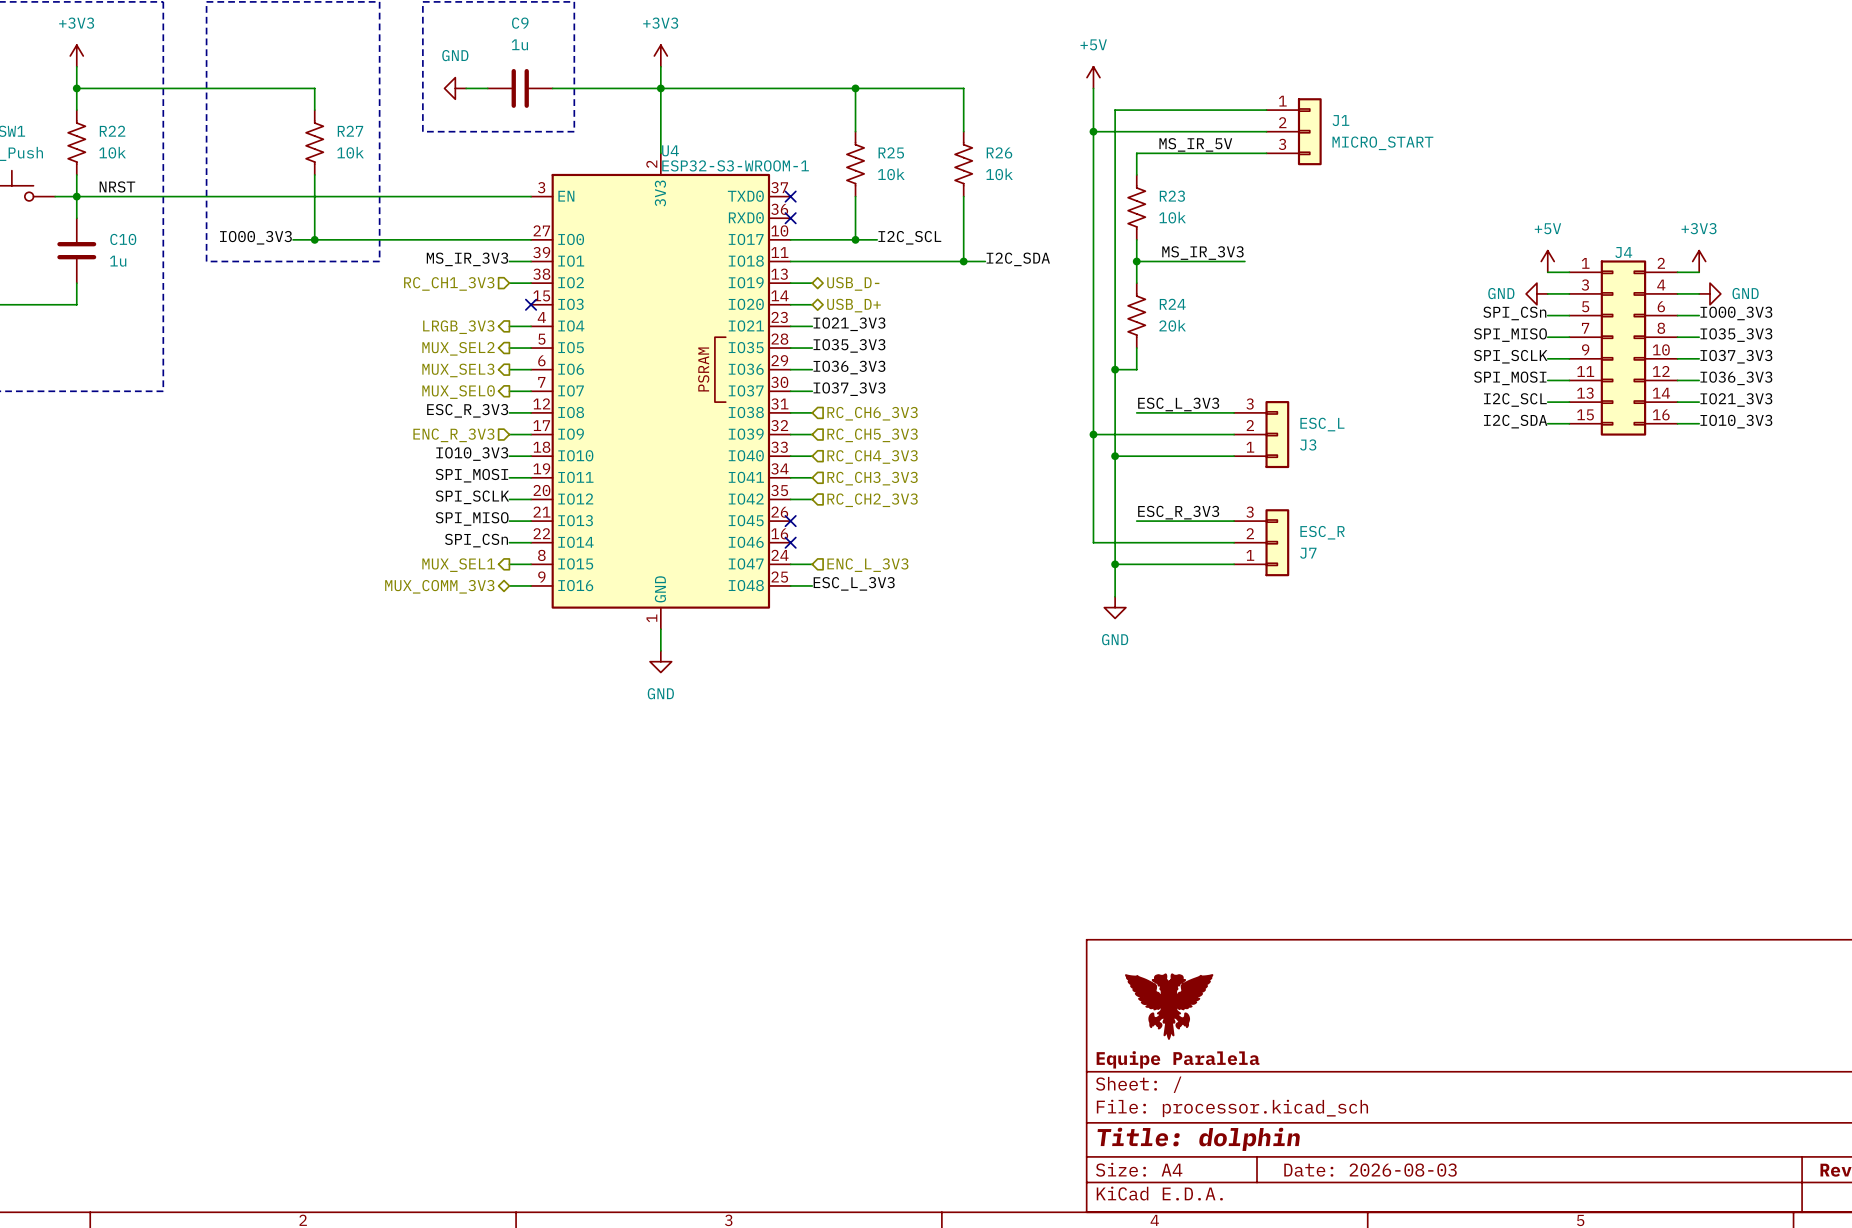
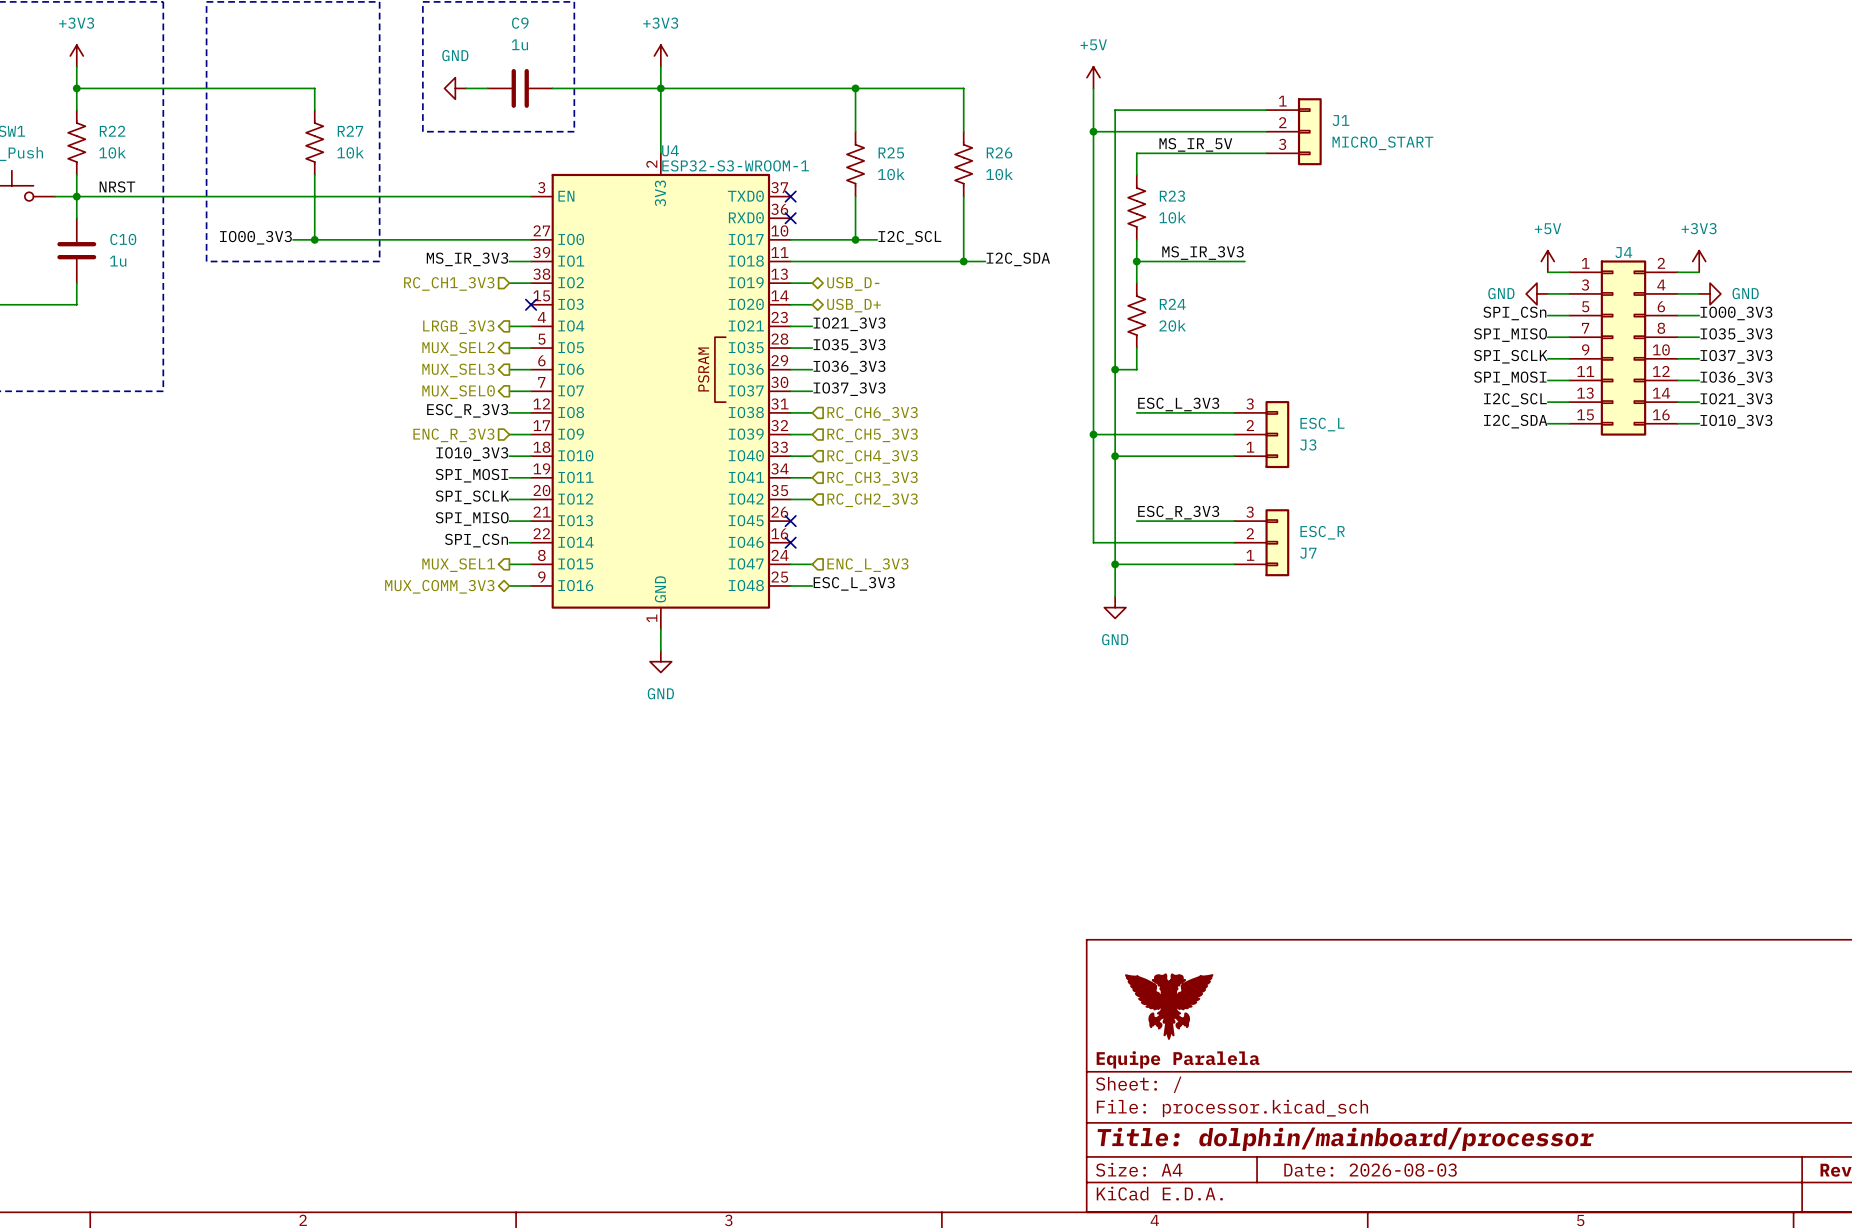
title block: Title: dolphin (1198, 1139) -> Title: dolphin/mainboard/processor (1345, 1139)

